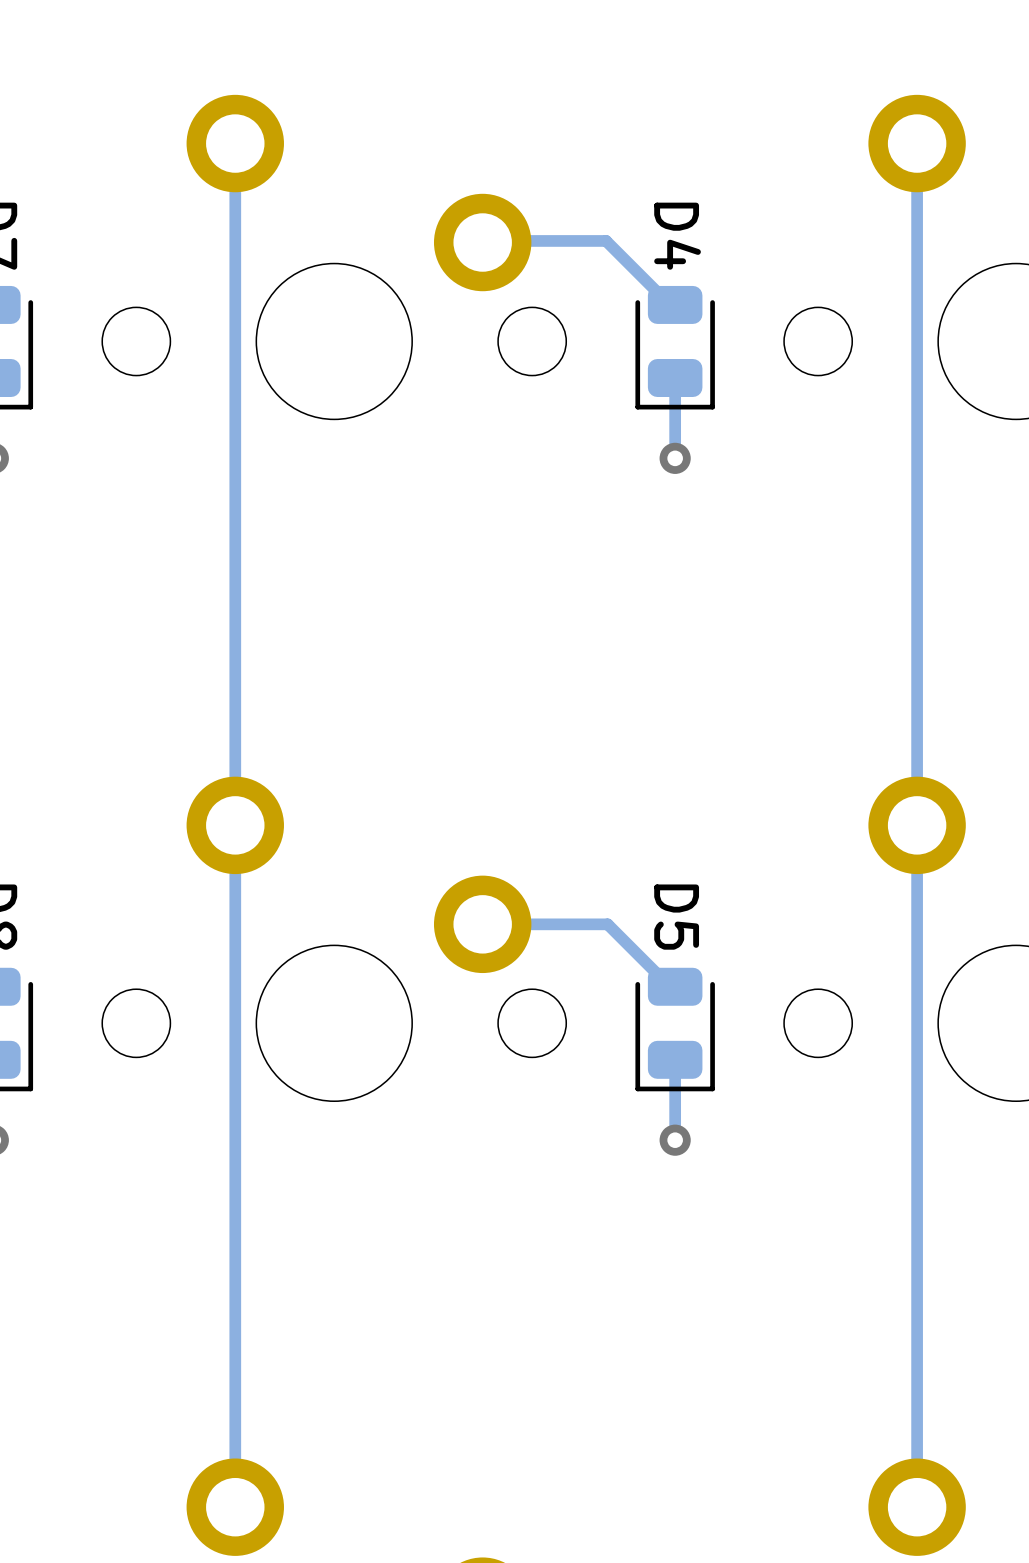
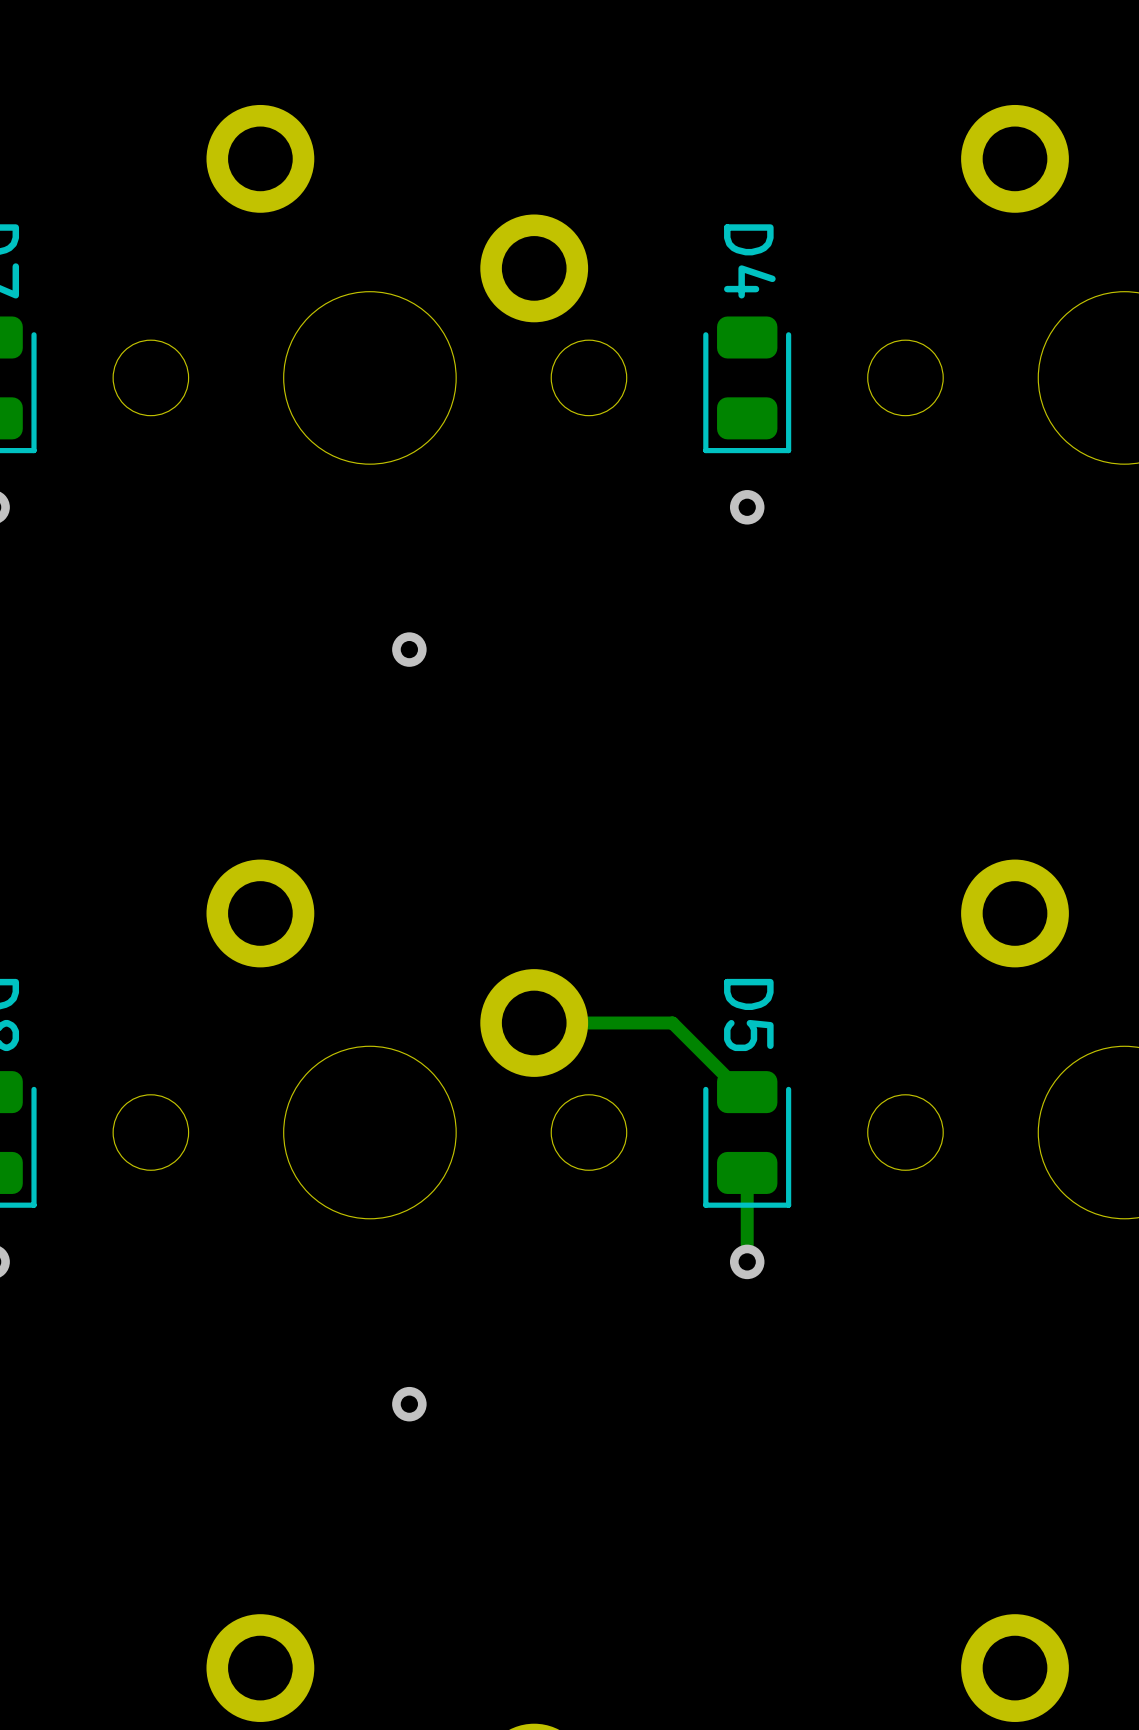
track: (235, 143) (235, 1507) -> none
track: (917, 143) (917, 1507) -> none
track: (494, 240) (606, 240) (670, 304) -> none
track: (675, 378) (675, 458) -> none
via: none -> (409, 649)
via: none -> (409, 1404)

